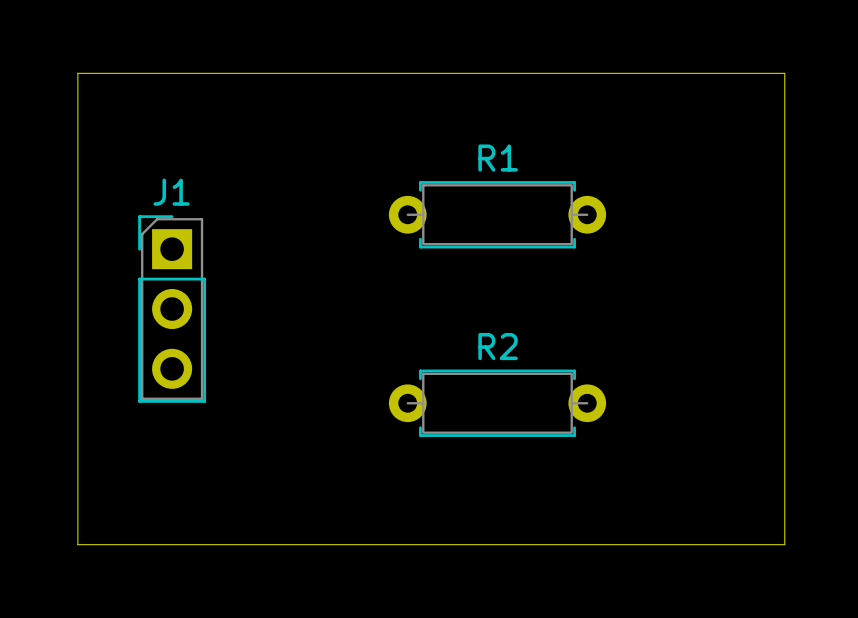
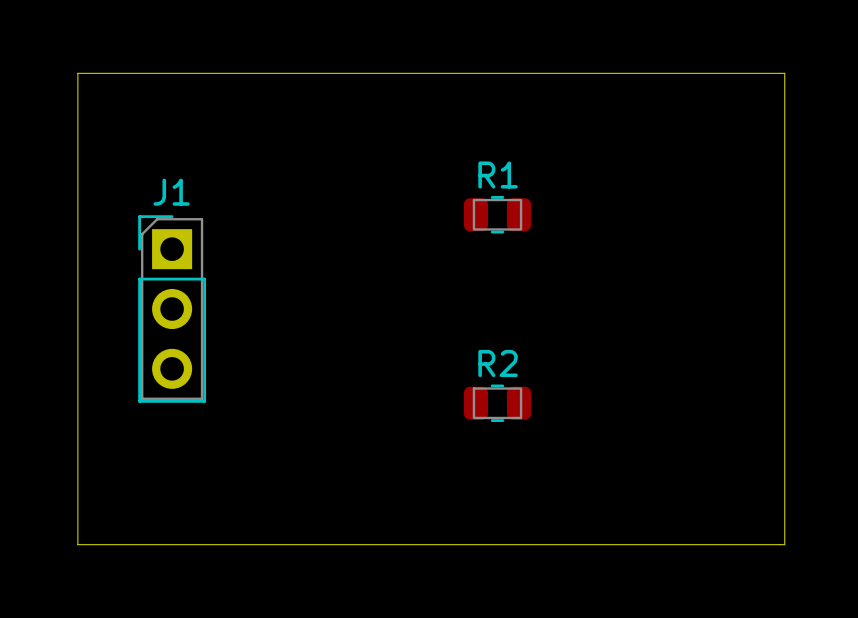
R1 footprint: [388, 181, 607, 249] -> [463, 196, 532, 234]
R2 footprint: [388, 369, 607, 437] -> [463, 384, 532, 422]

